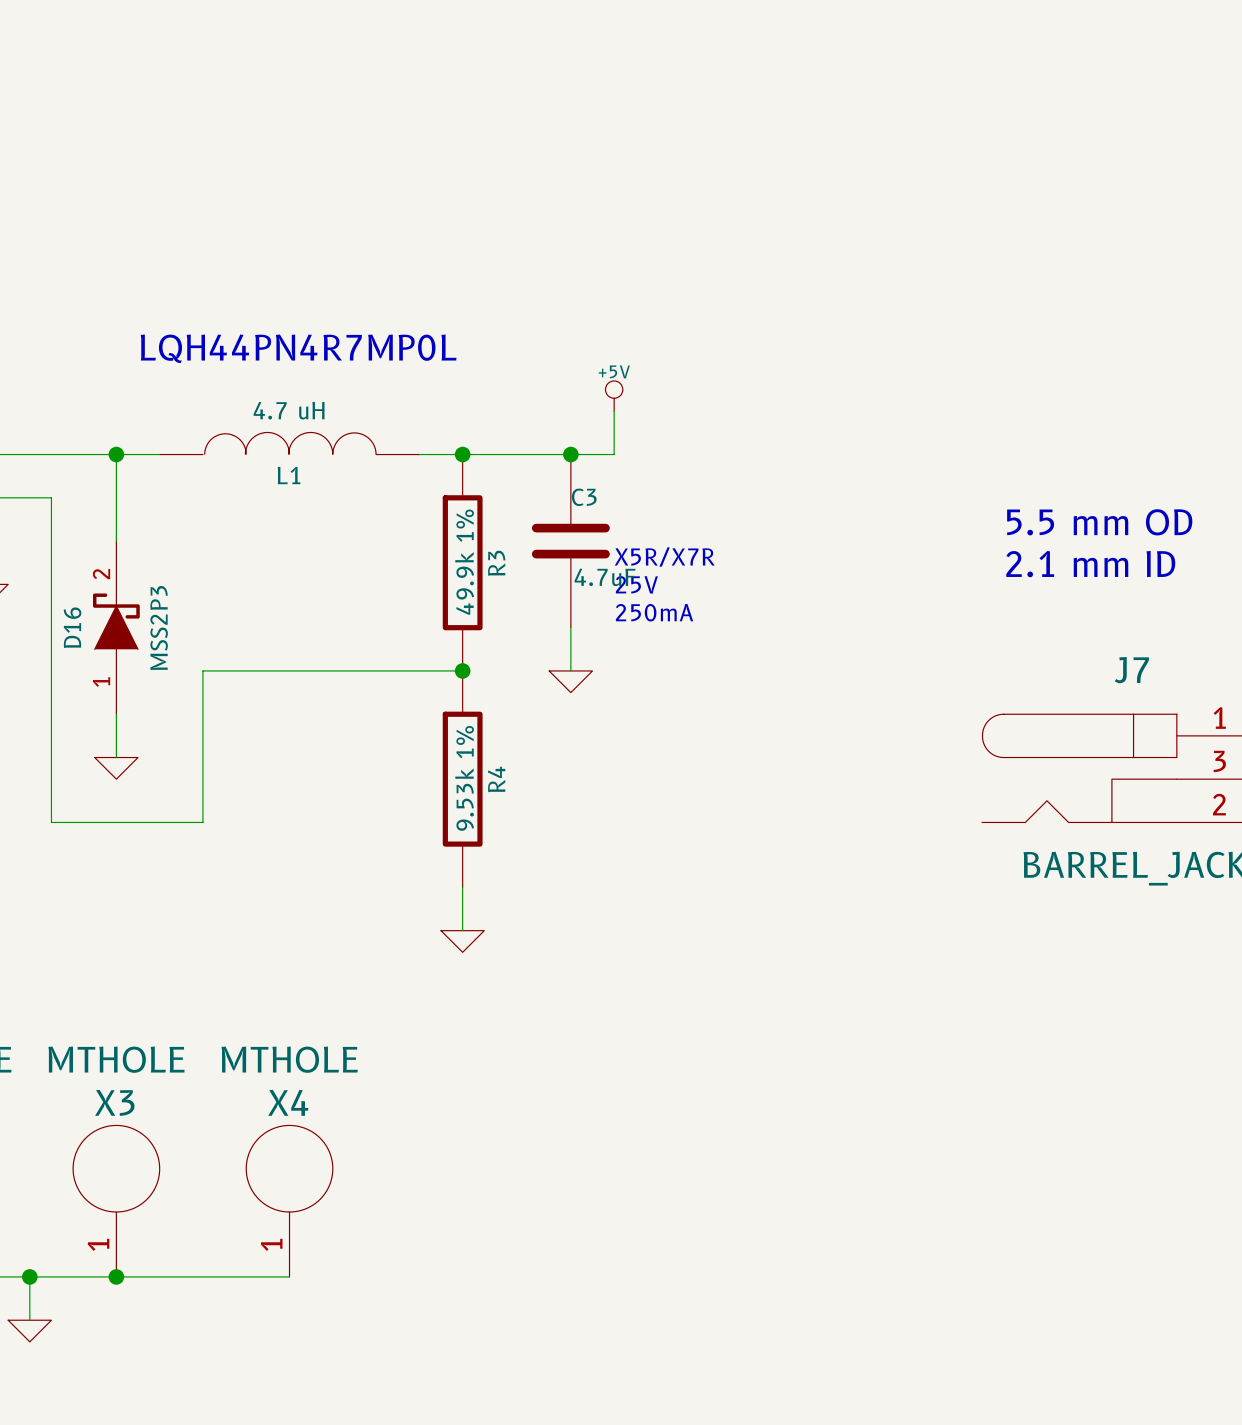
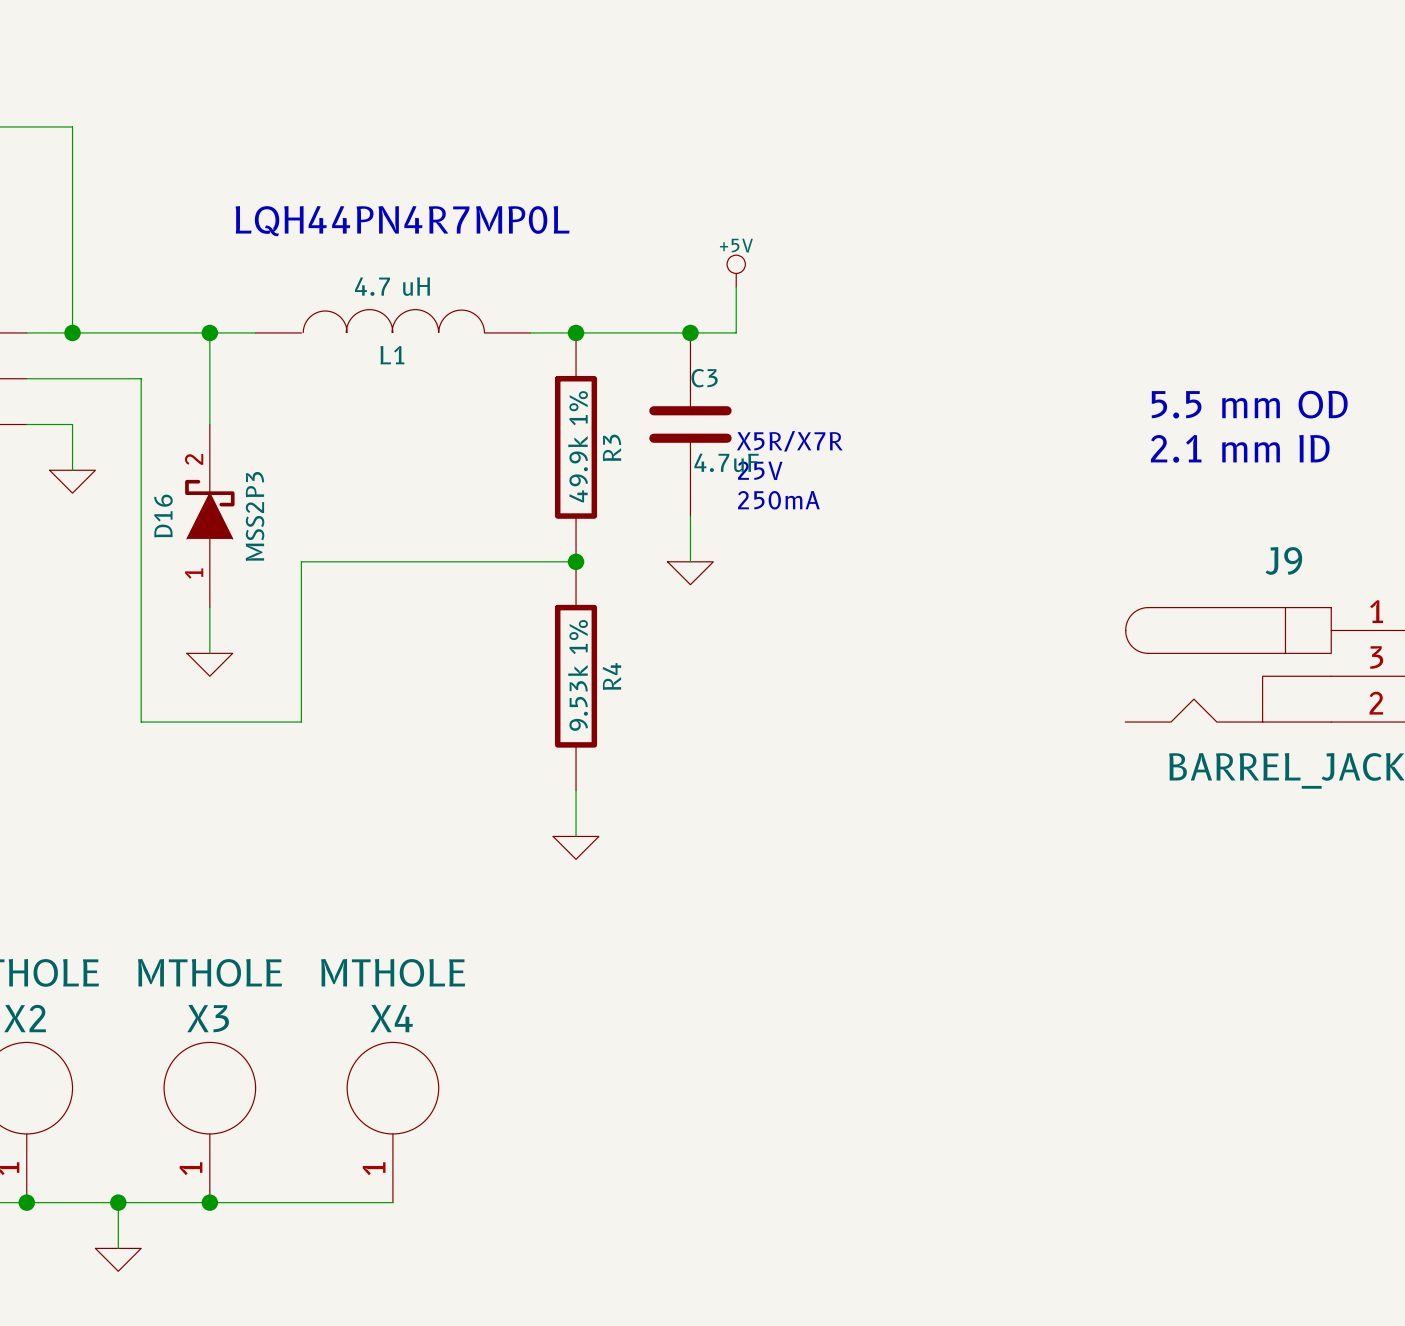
J7 name: J7 (1131, 670) -> J9 (1283, 560)

